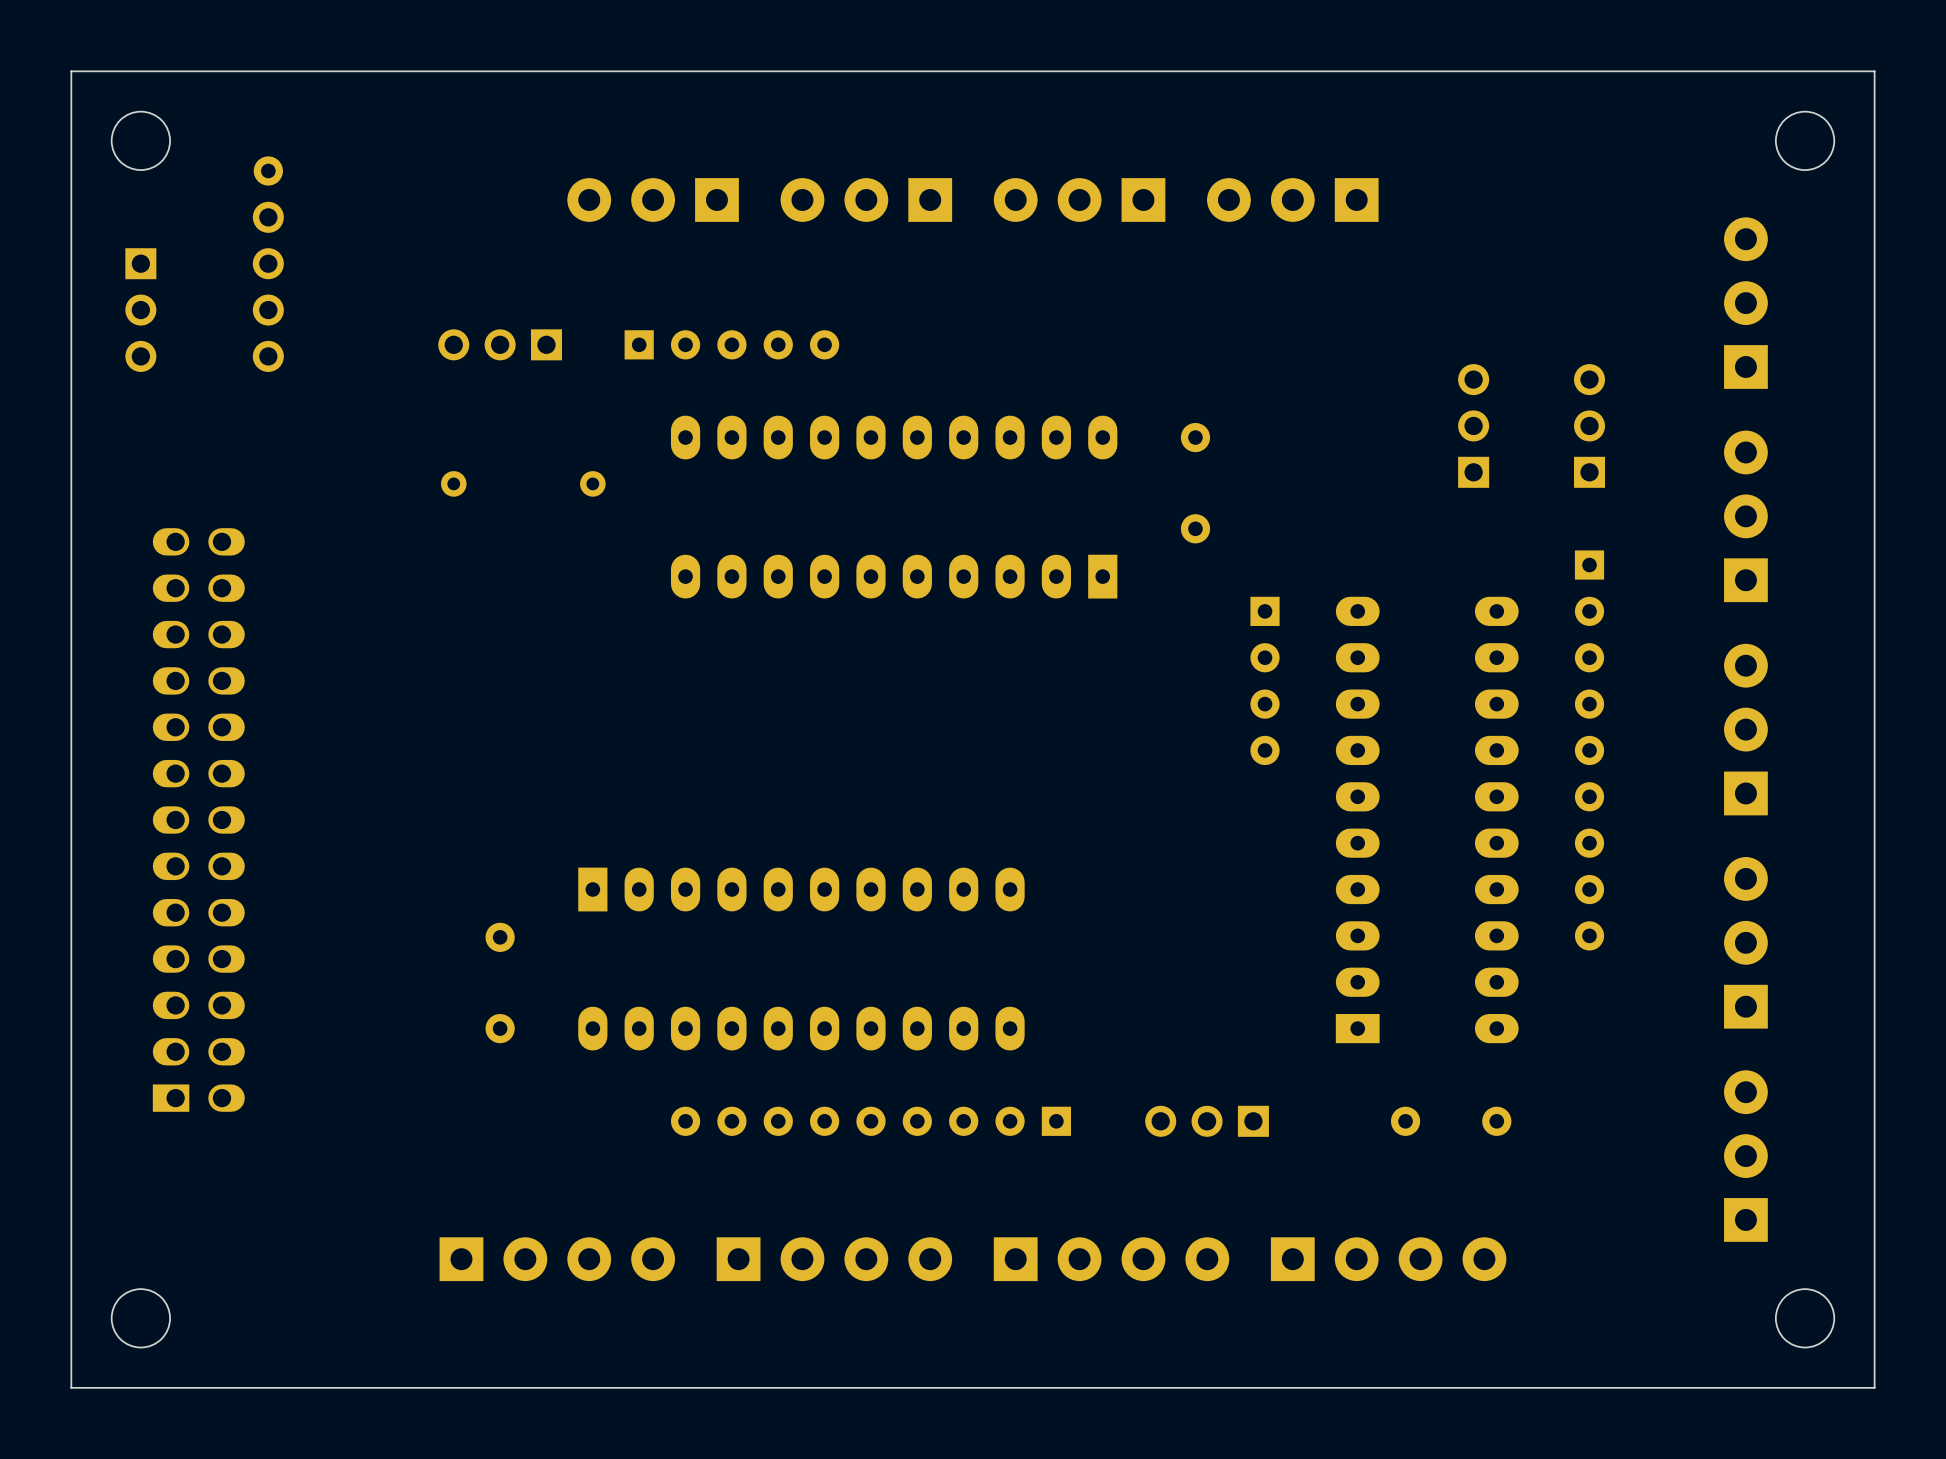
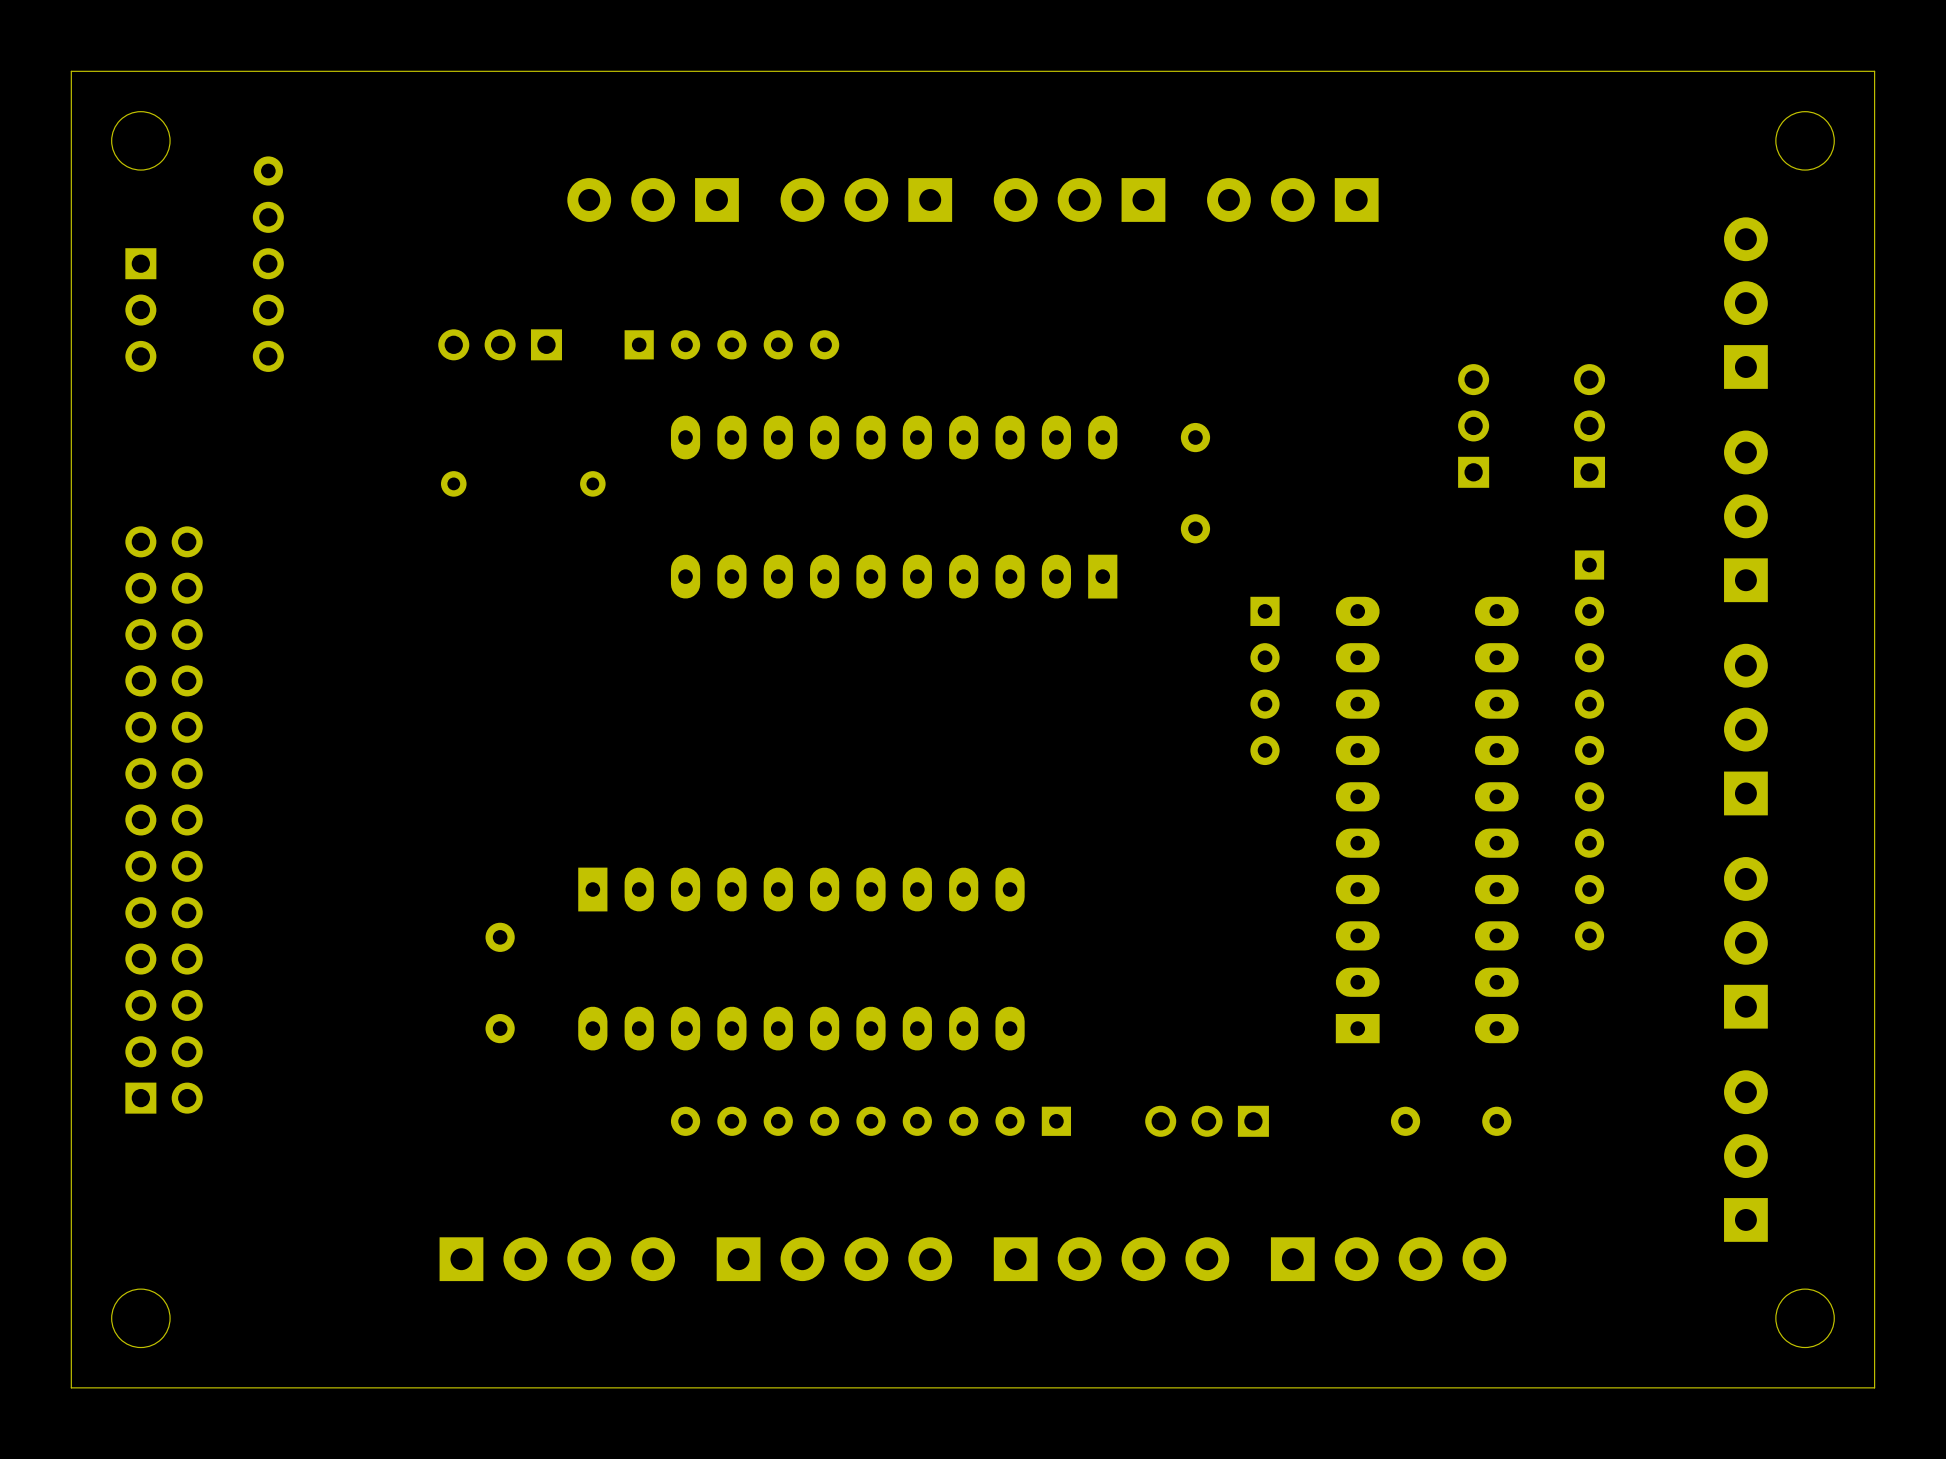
part: none -> (164, 819)
part: (198, 819) -> none

